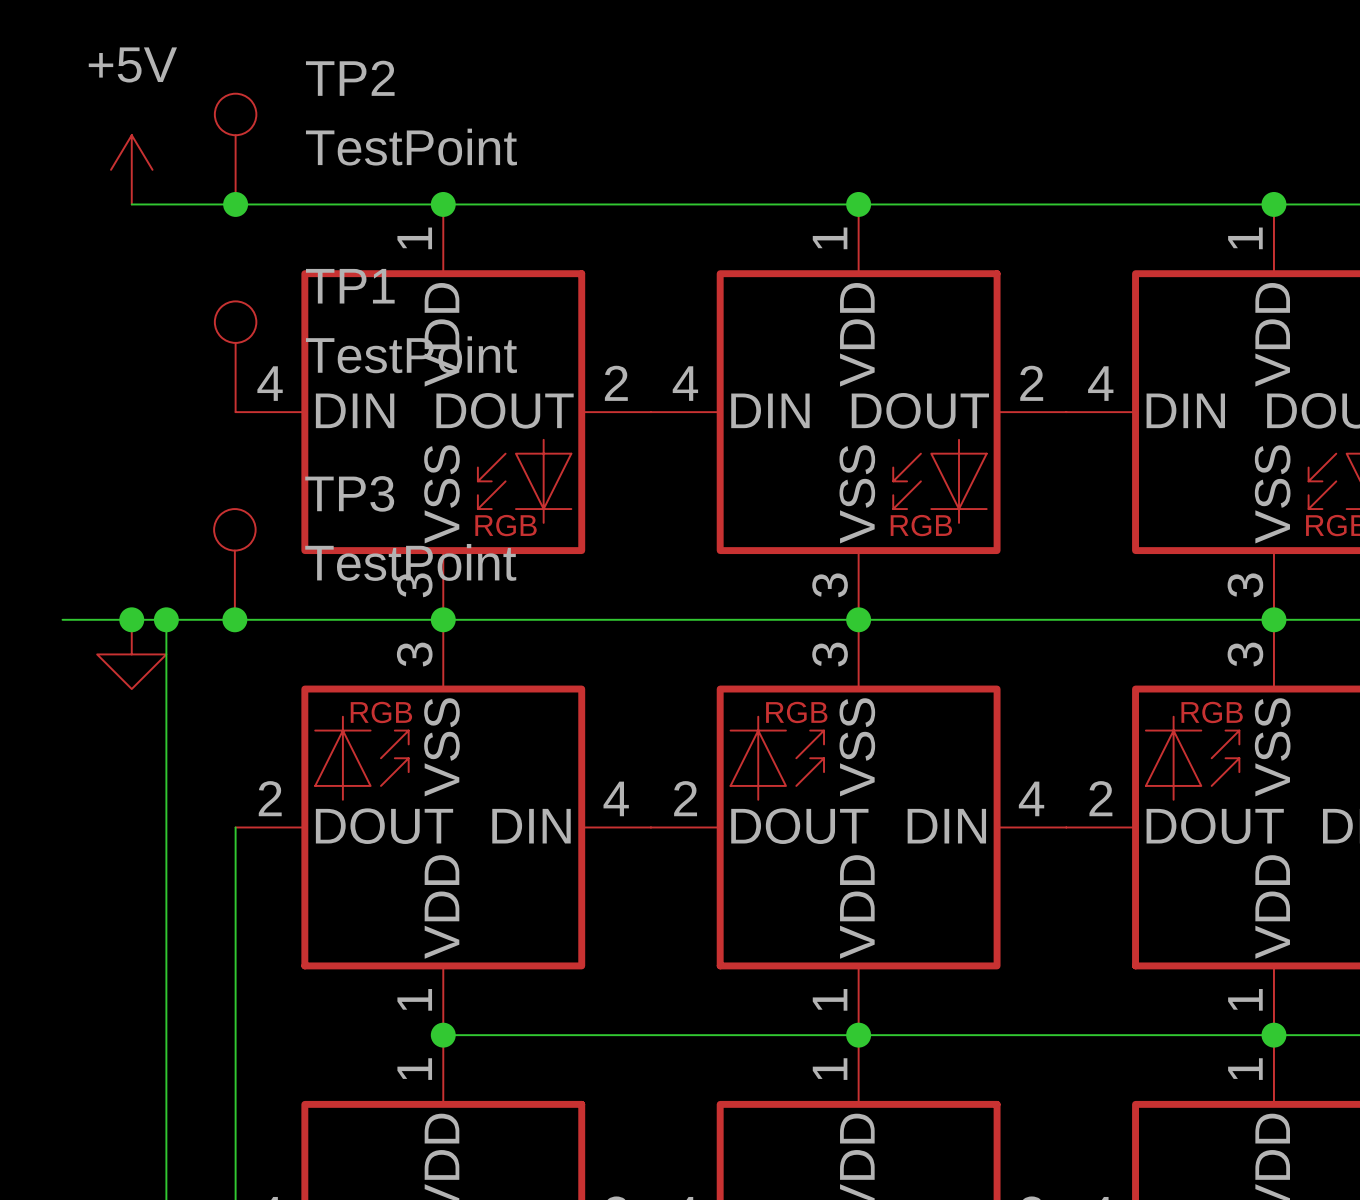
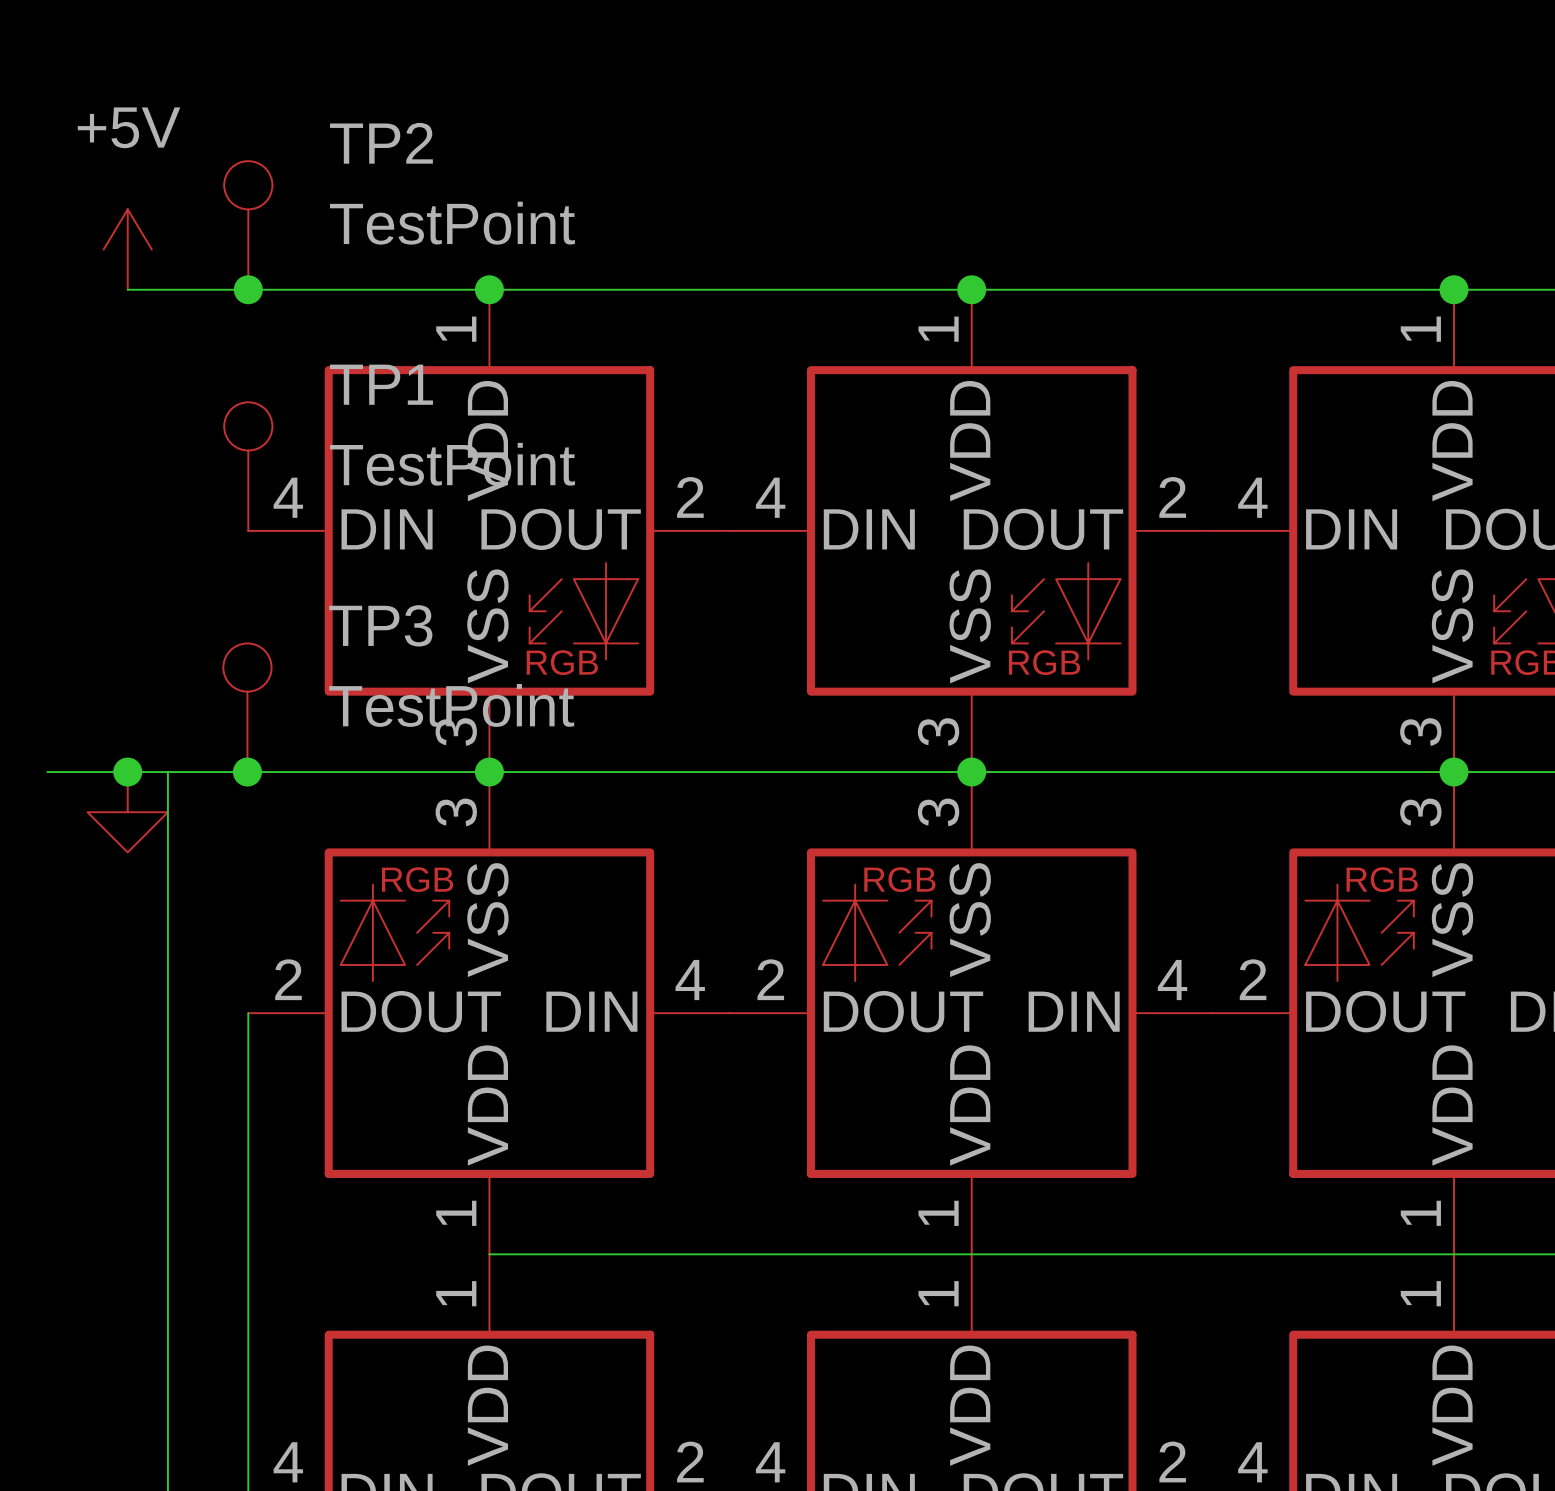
junction: (166, 619) -> none
junction: (443, 1035) -> none
junction: (858, 1035) -> none
junction: (1273, 1035) -> none

